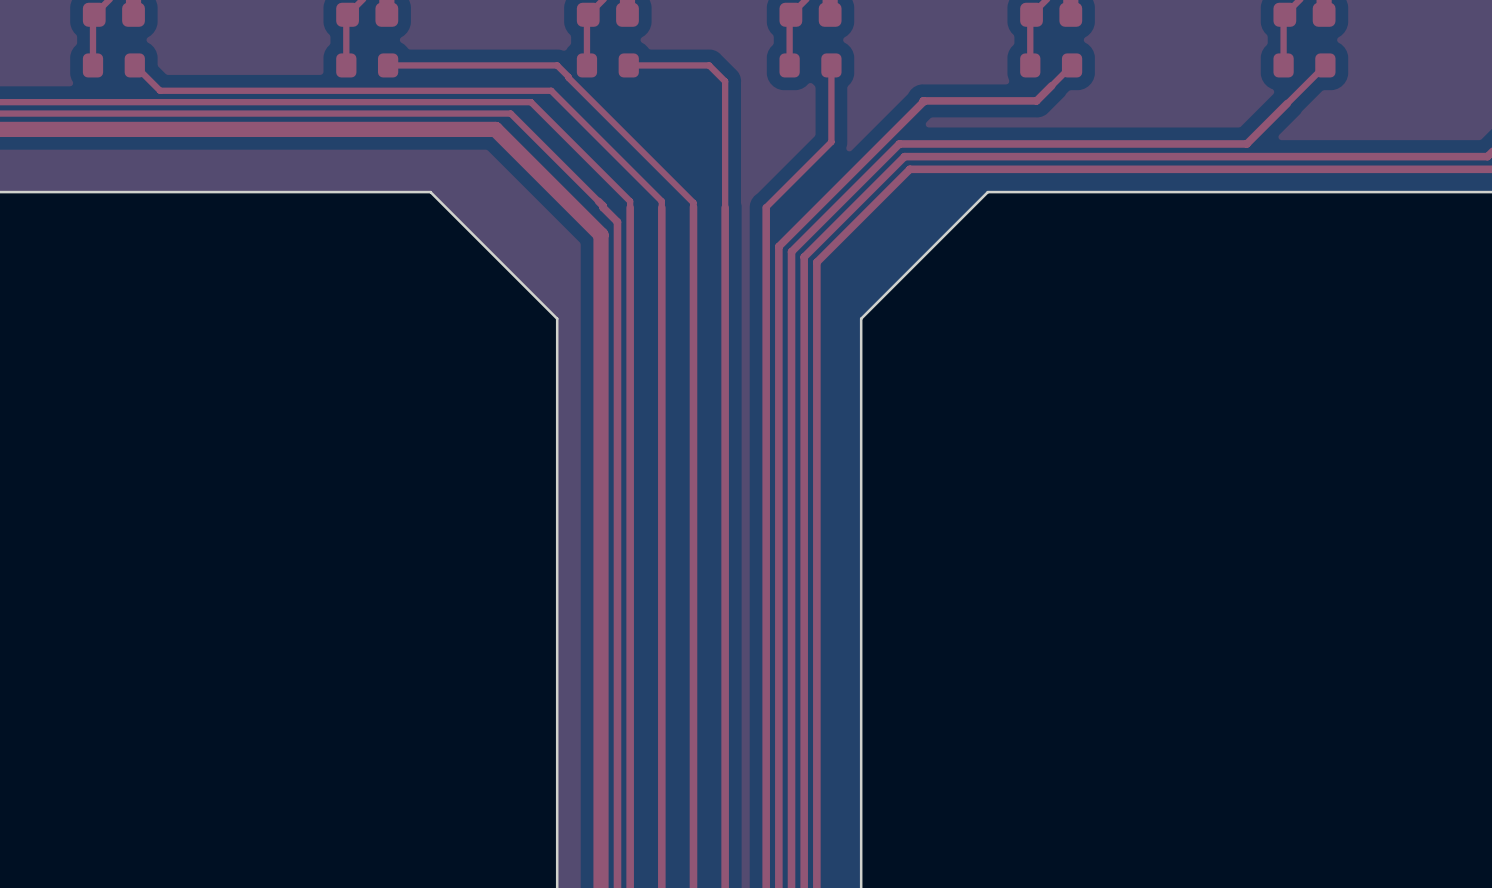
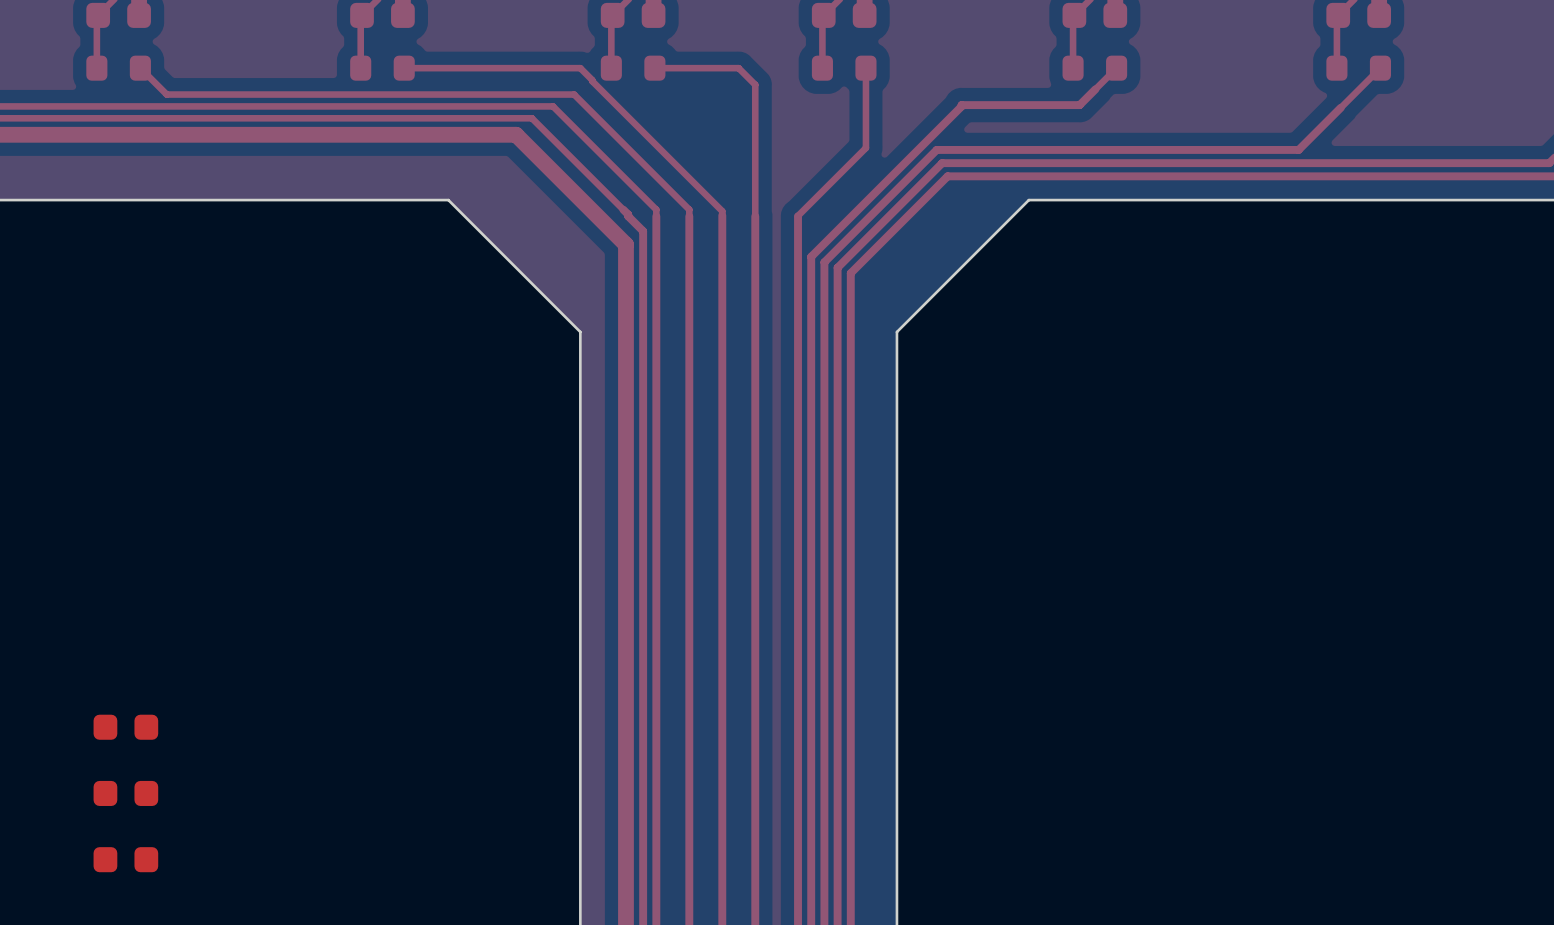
part: none -> (125, 727)
part: none -> (125, 793)
part: none -> (125, 859)

